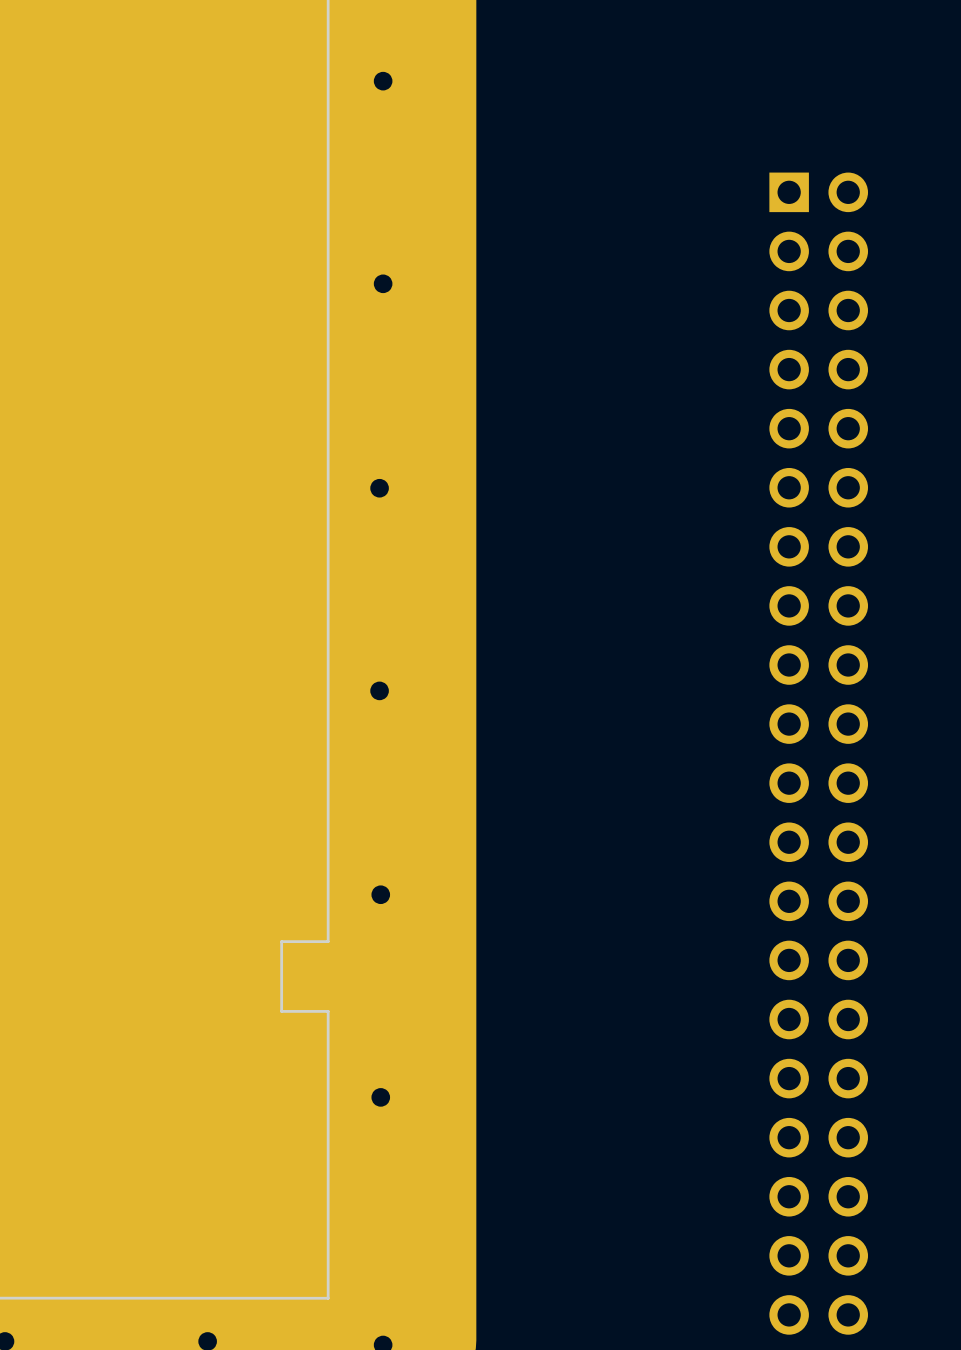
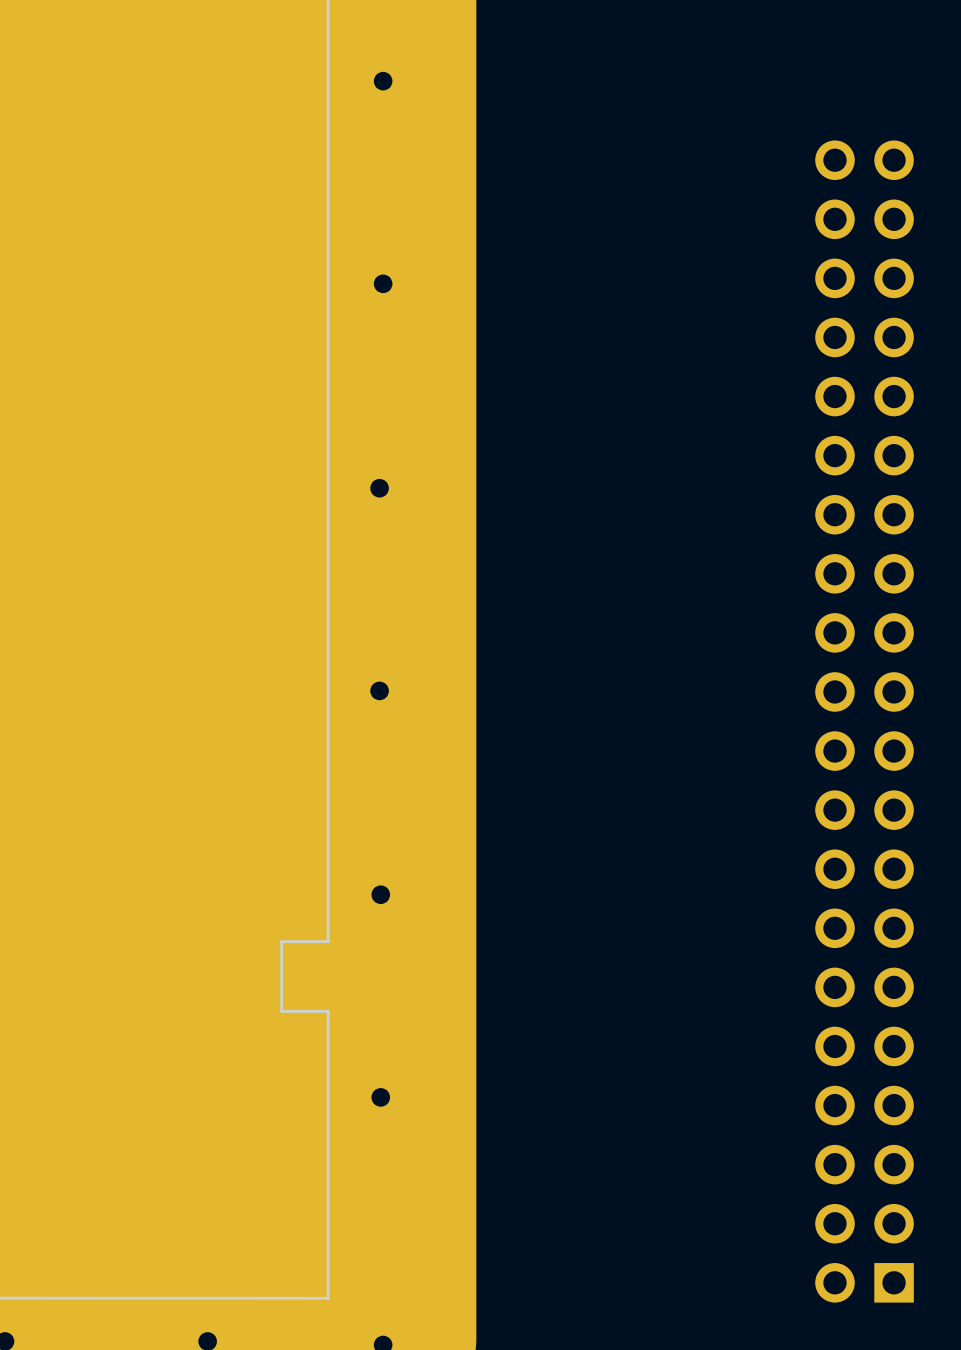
part rotation: 0° (818, 753) -> 180° (864, 721)

